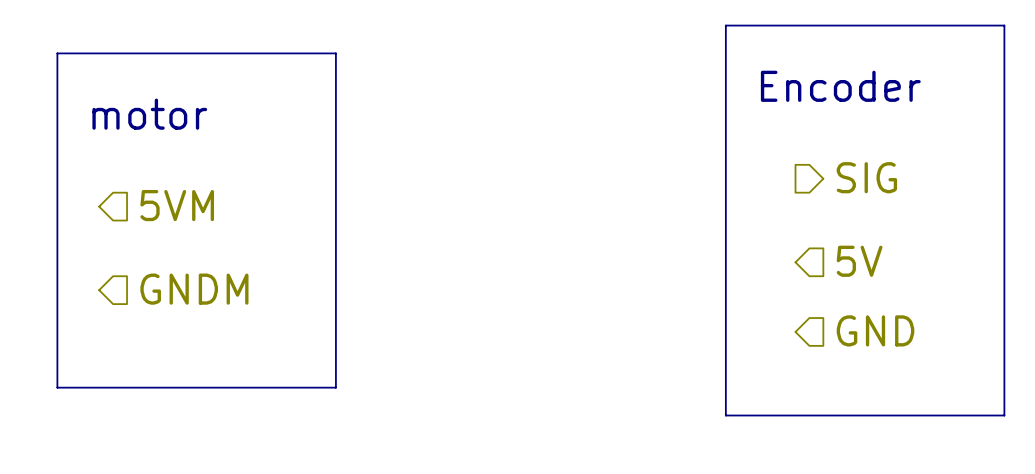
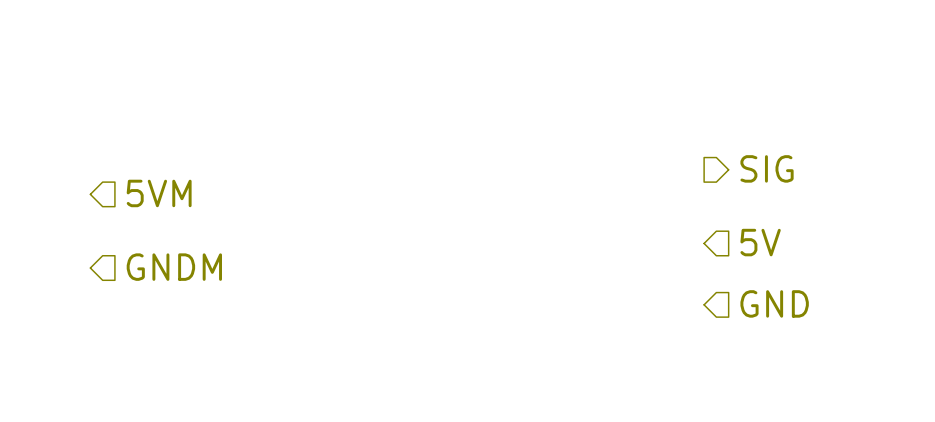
line: (725, 25) (1004, 25) (1004, 415) (725, 415) (725, 25) -> none
line: (57, 53) (335, 53) (335, 387) (57, 387) (57, 53) -> none
text: Encoder (840, 86) -> none
text: motor (149, 114) -> none

